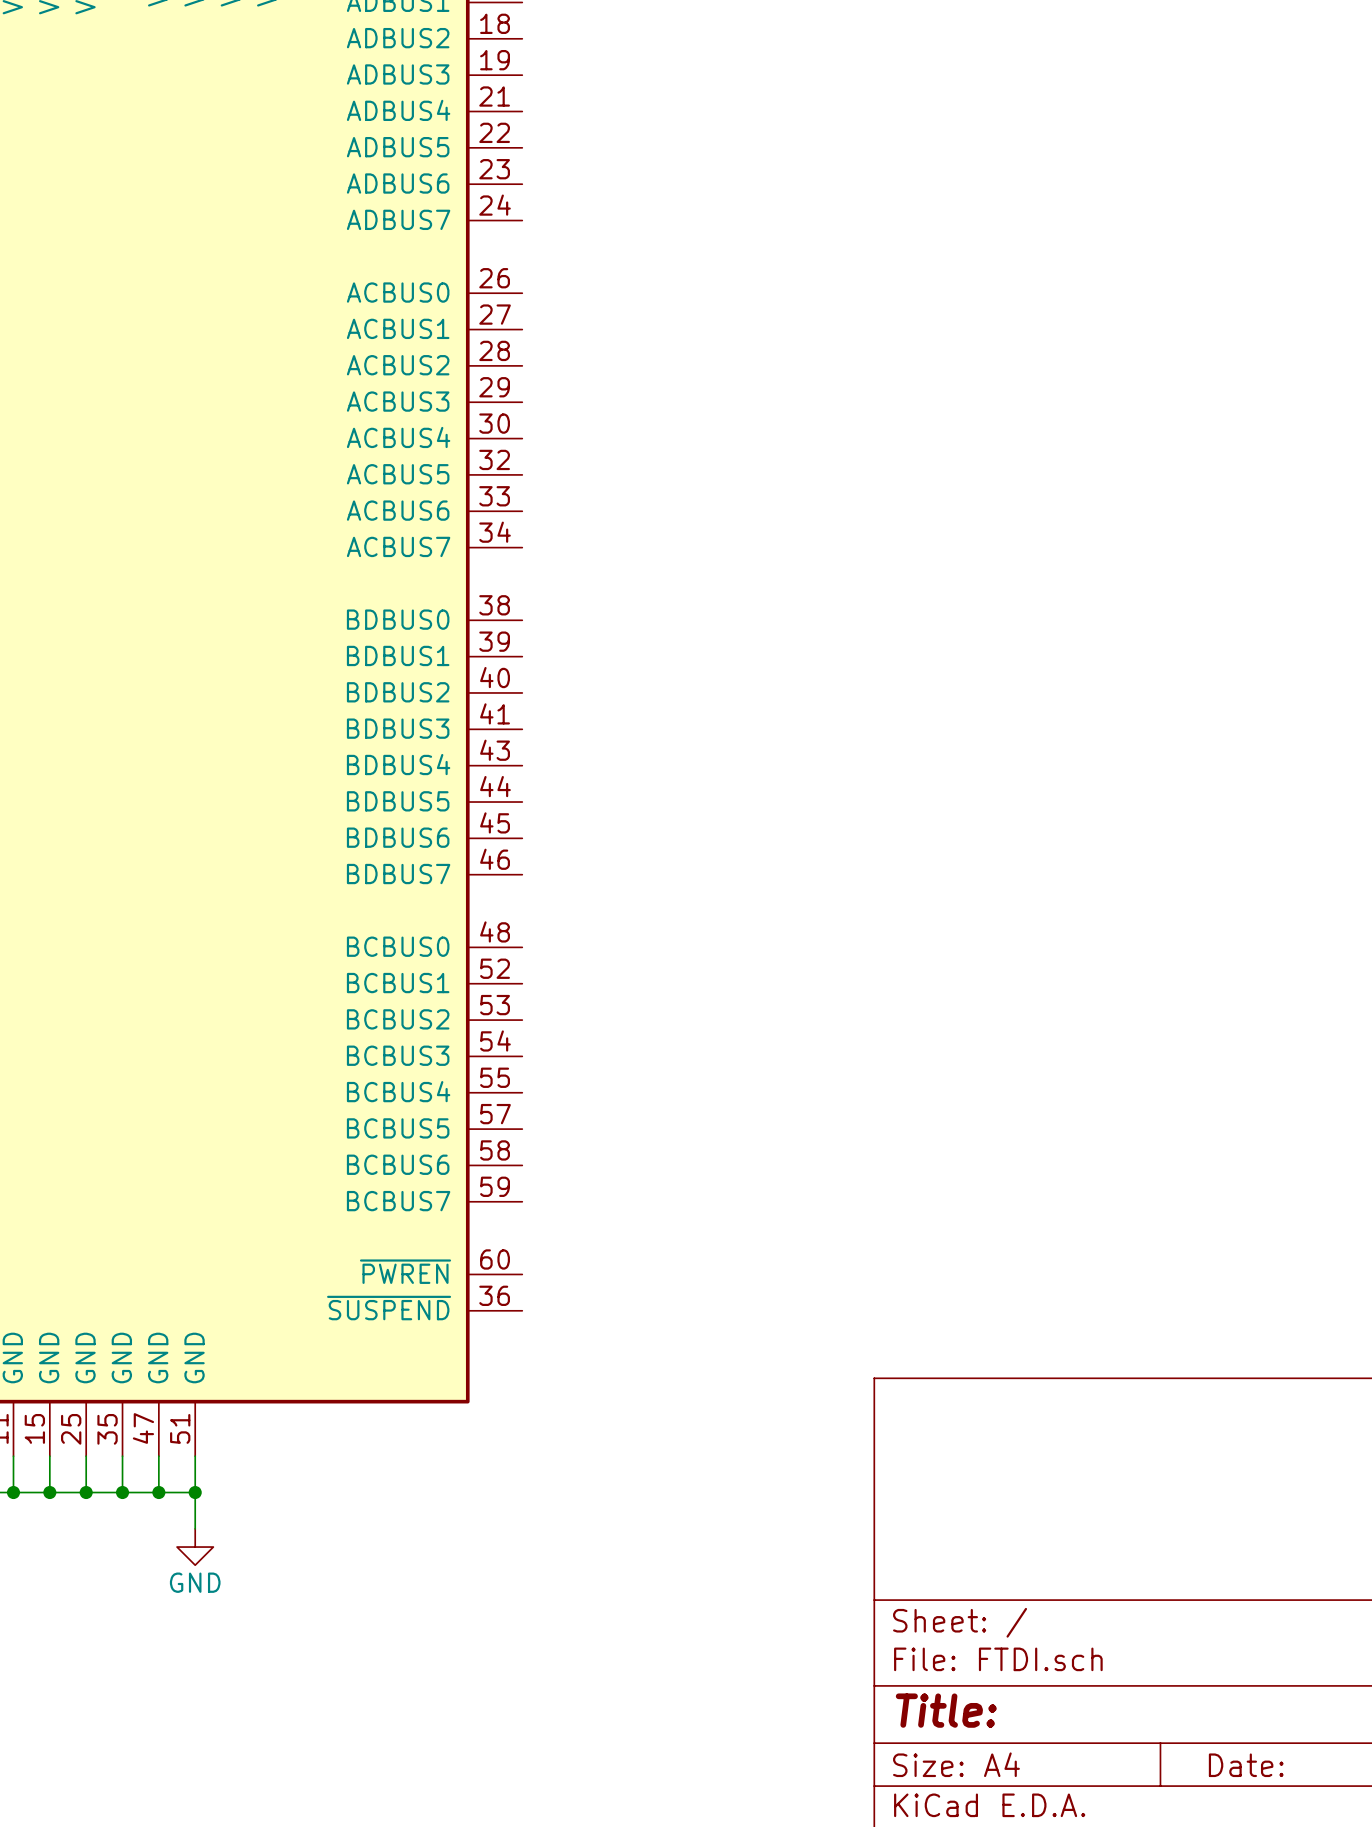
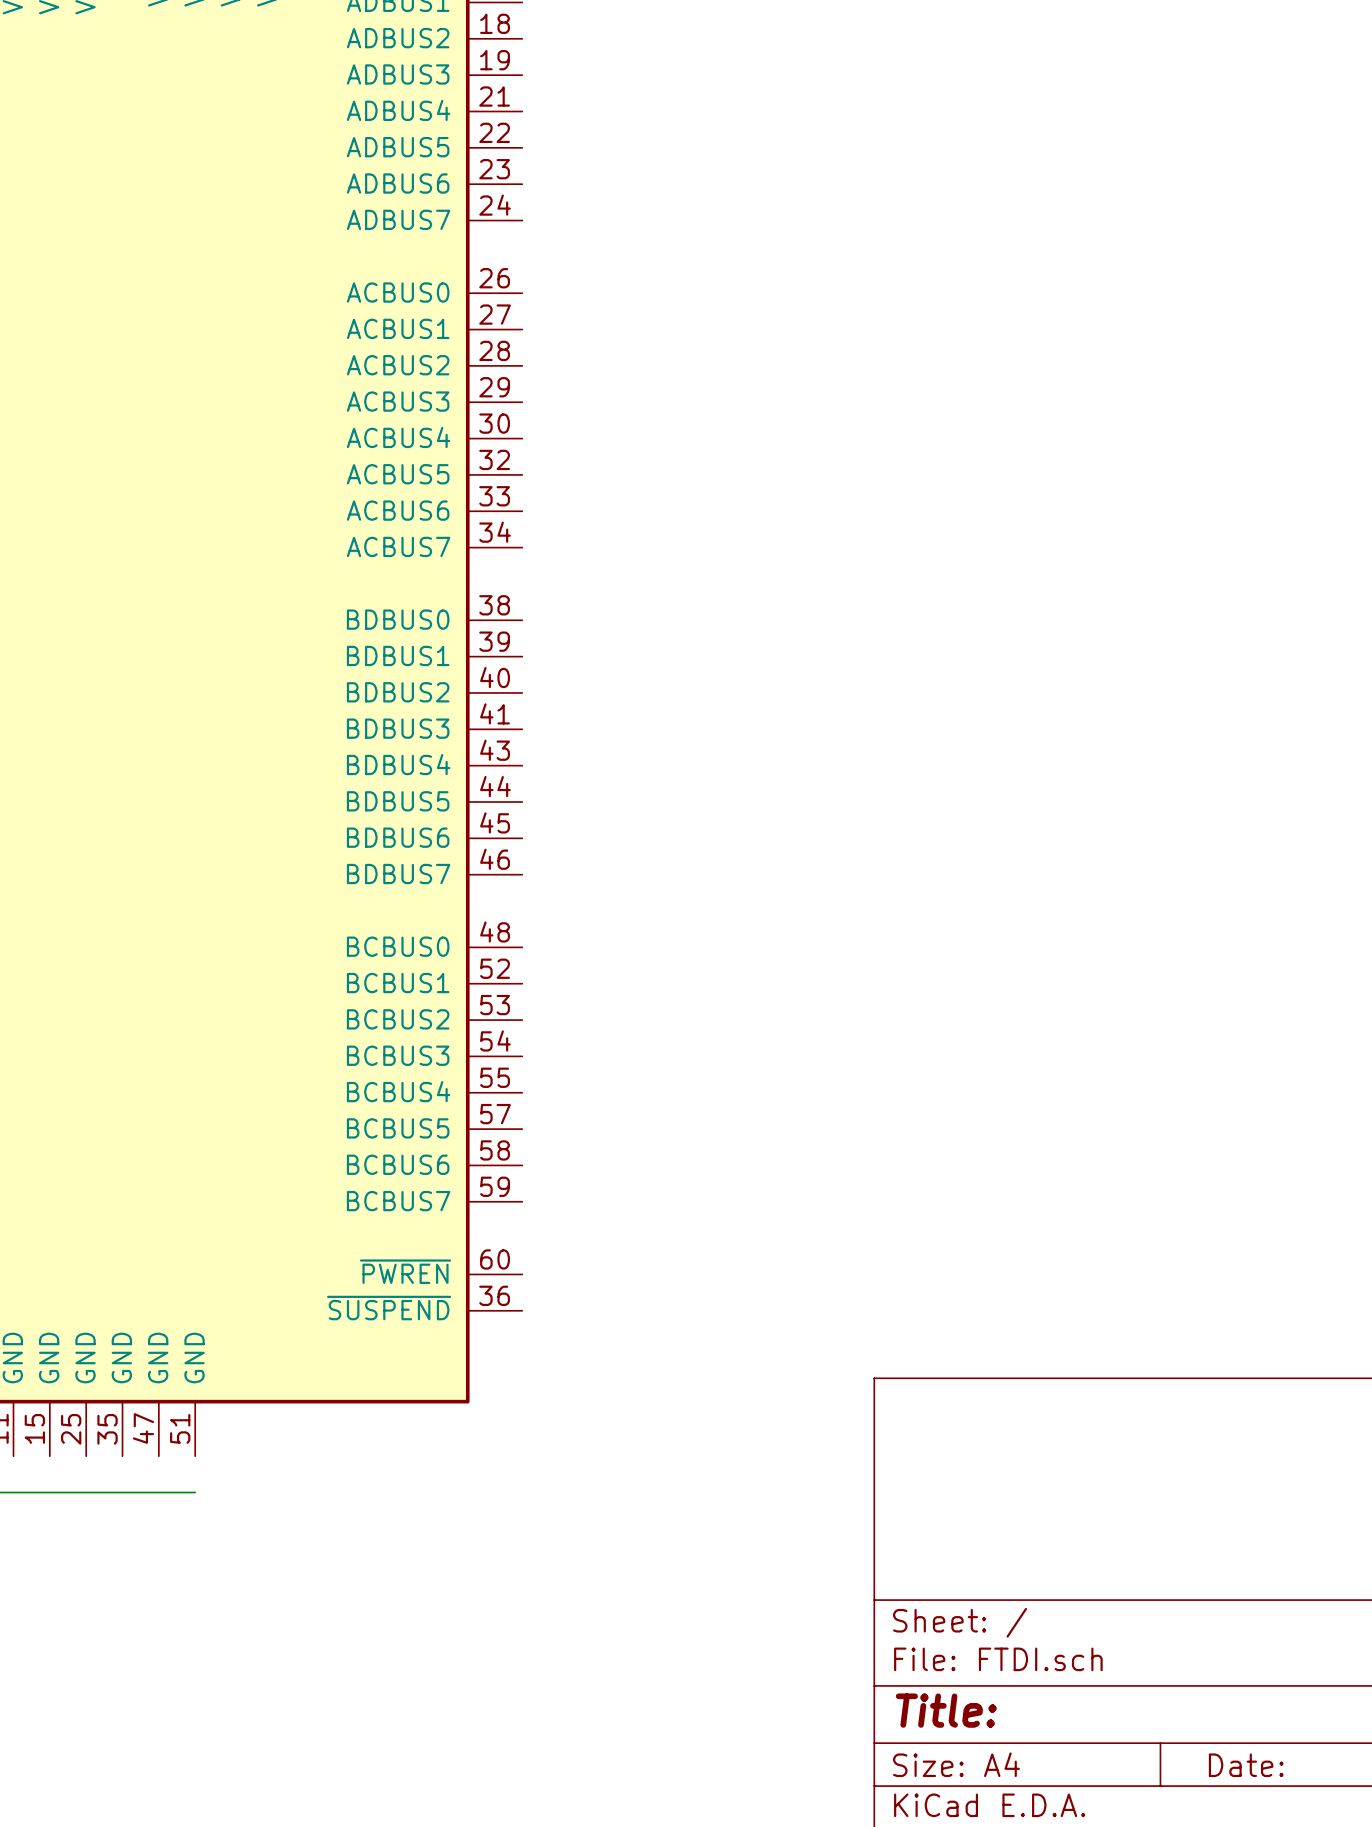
wire: (13, 1456) (13, 1492) -> none
wire: (49, 1456) (49, 1492) -> none
wire: (86, 1456) (86, 1492) -> none
wire: (122, 1456) (122, 1492) -> none
wire: (158, 1456) (158, 1492) -> none
wire: (195, 1456) (195, 1528) -> none
junction: (13, 1492) -> none
junction: (49, 1492) -> none
junction: (86, 1492) -> none
junction: (122, 1492) -> none
junction: (158, 1492) -> none
junction: (195, 1492) -> none
power symbol: GND (195, 1547) -> none

